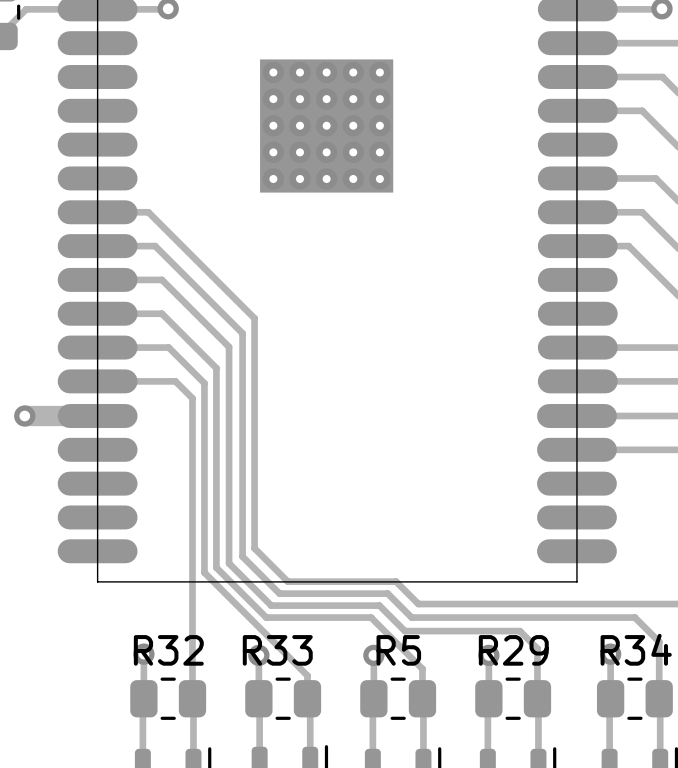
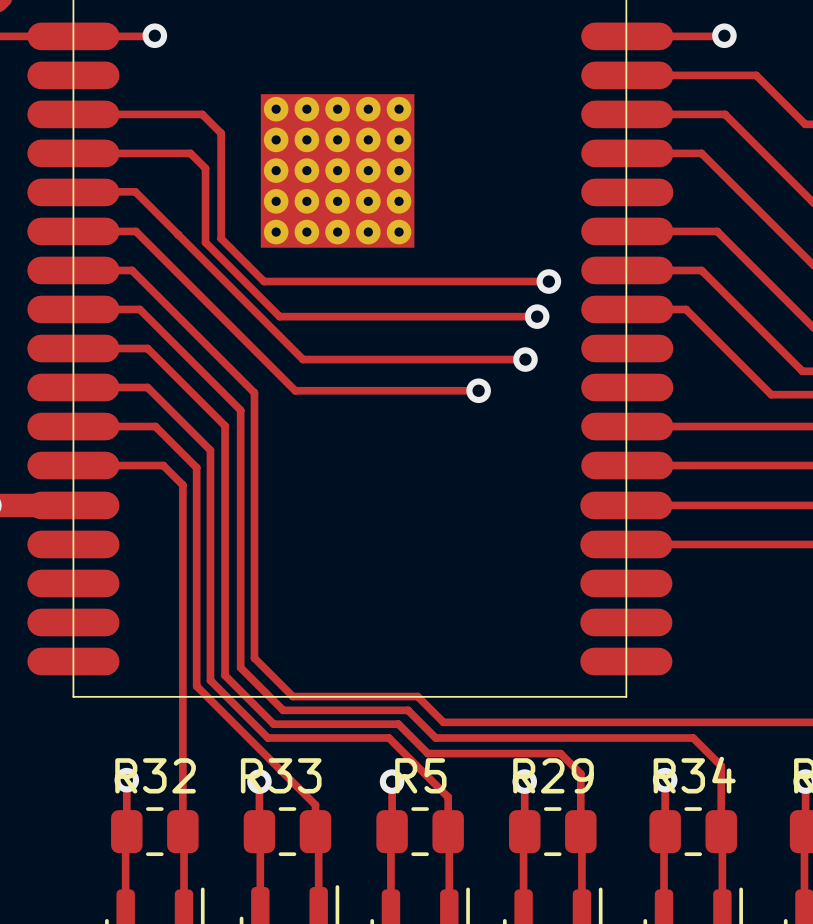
track: none -> (73, 114) (202, 114) (221, 133) (221, 238) (264, 281) (548, 281)
track: none -> (73, 153) (190, 153) (205, 168) (205, 242) (279, 316) (537, 316)
track: none -> (73, 192) (135, 191) (303, 359) (525, 359)
track: none -> (73, 231) (135, 231) (295, 390) (478, 390)
via: none -> (548, 281)
via: none -> (537, 316)
via: none -> (525, 359)
via: none -> (478, 390)

